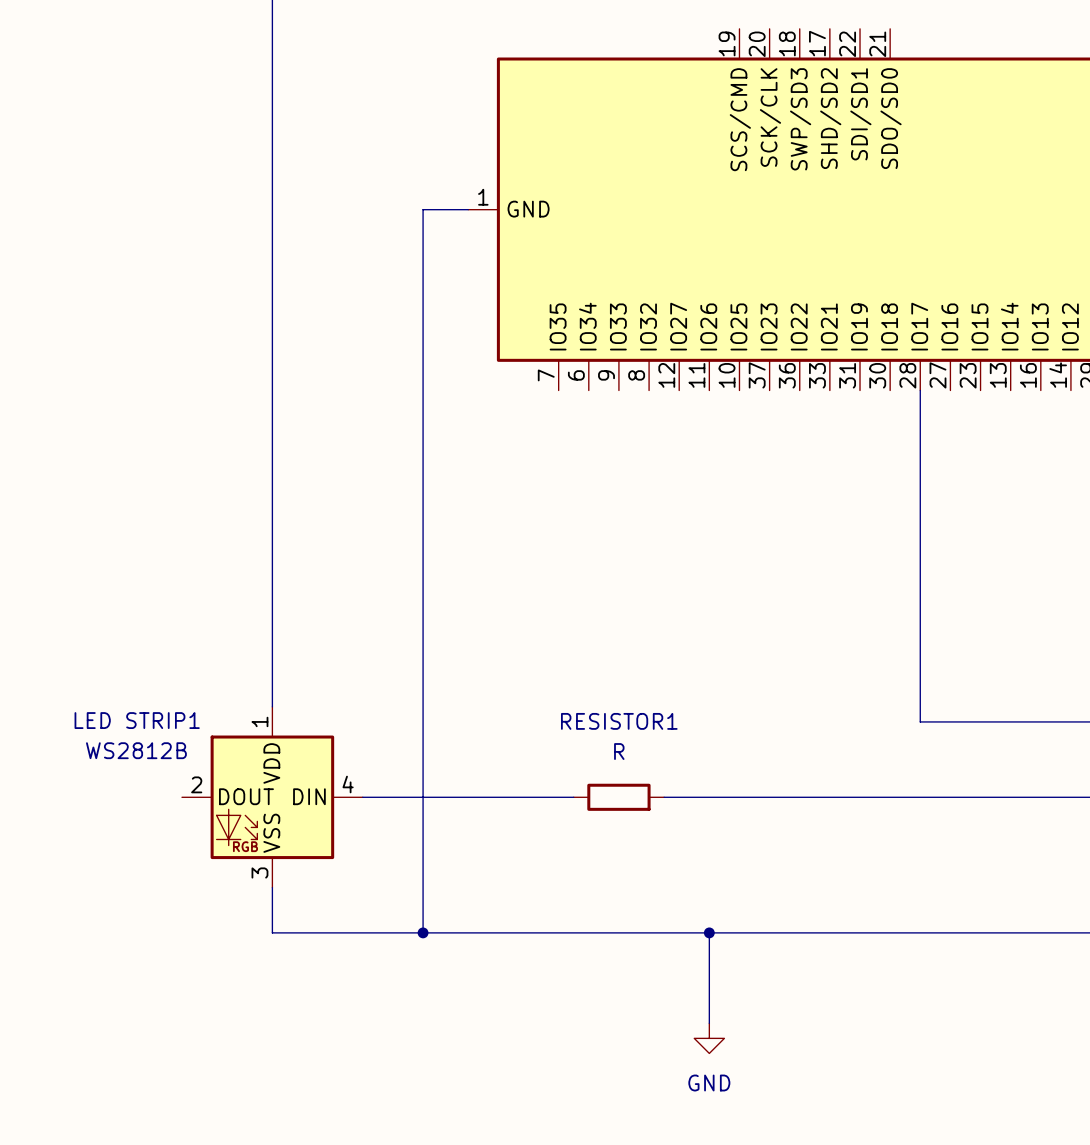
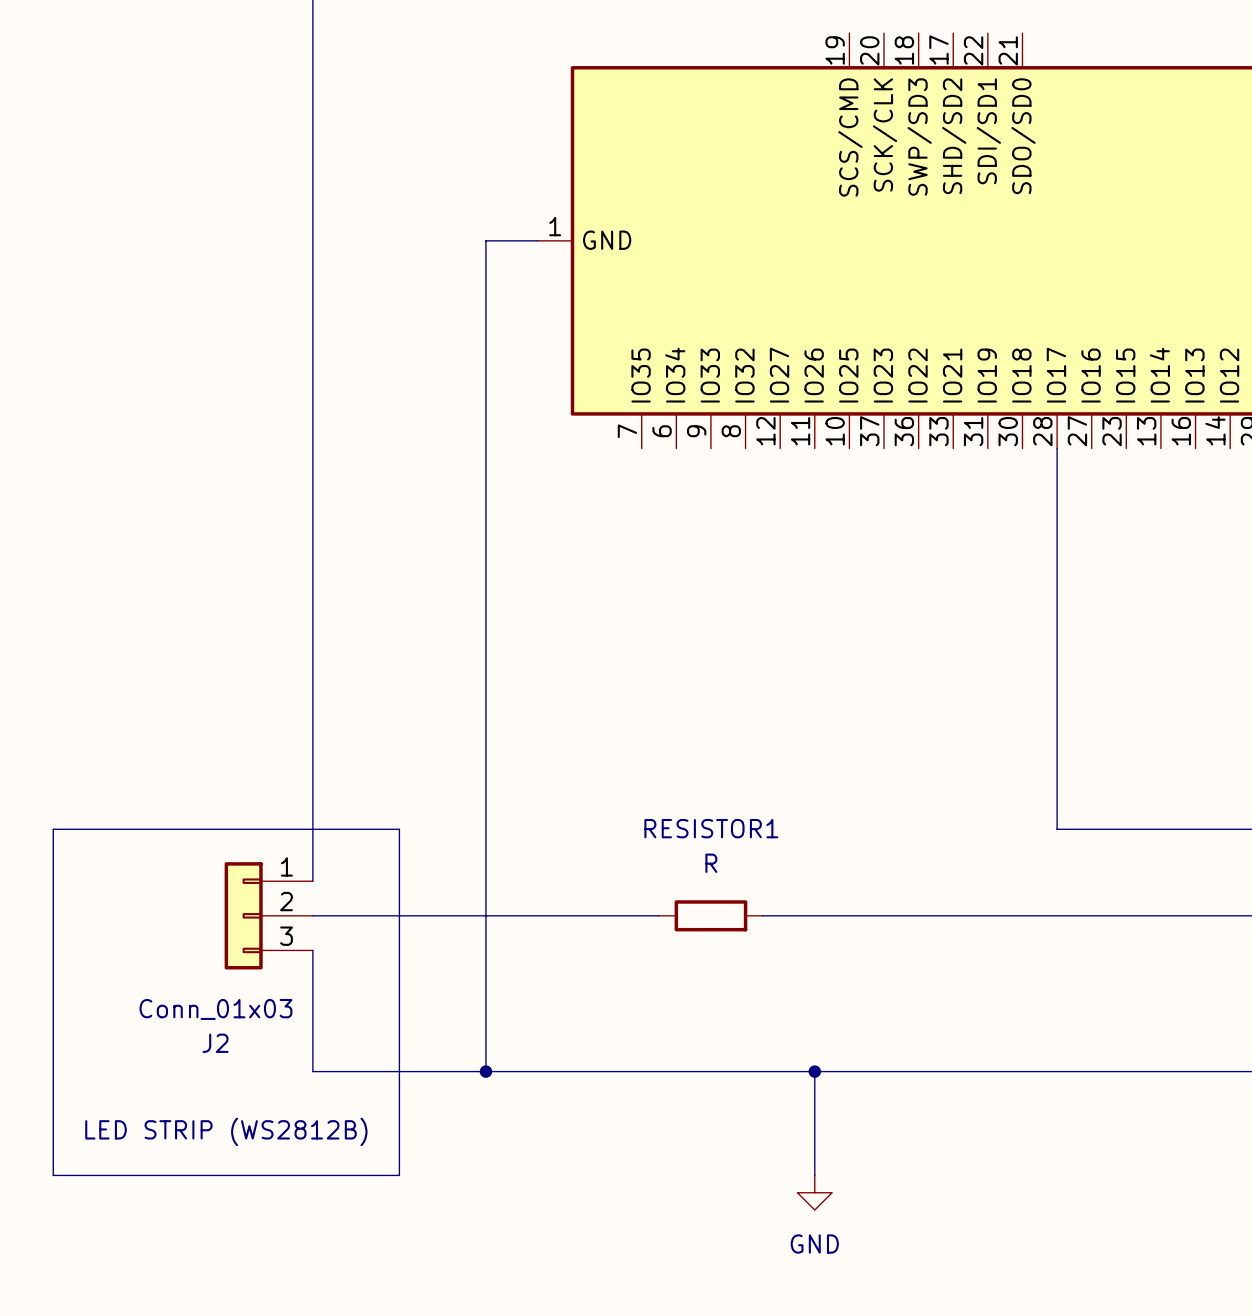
line: none -> (53, 829) (399, 829) (399, 1175) (53, 1175) (53, 829)
J2: none -> Conn_01x03 (268, 915)
LED STRIP1: WS2812B (272, 797) -> none
text: none -> LED STRIP (WS2812B) (226, 1131)

